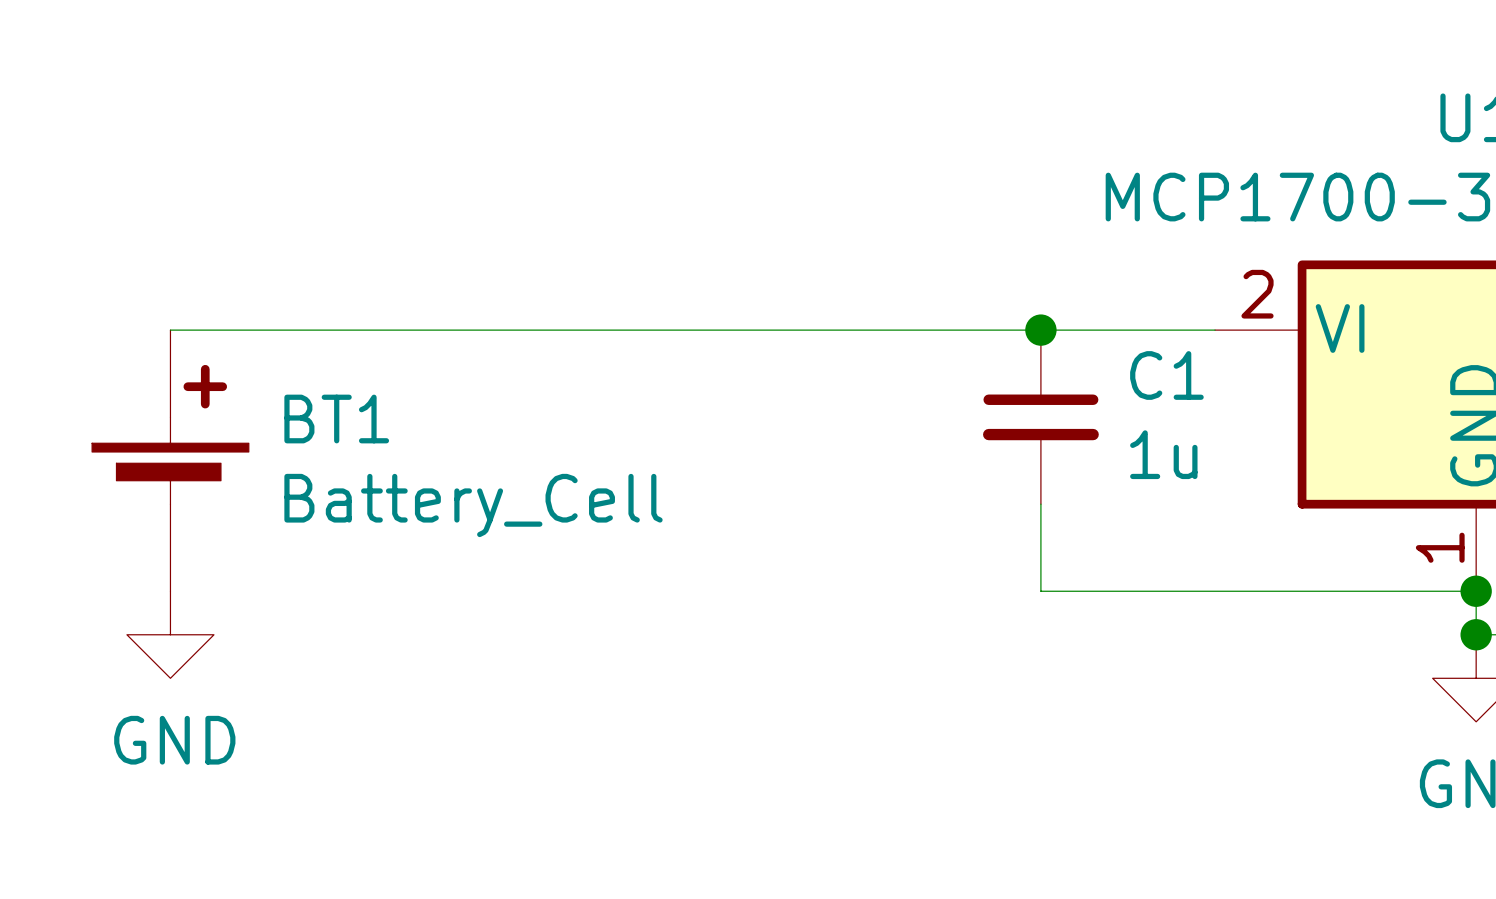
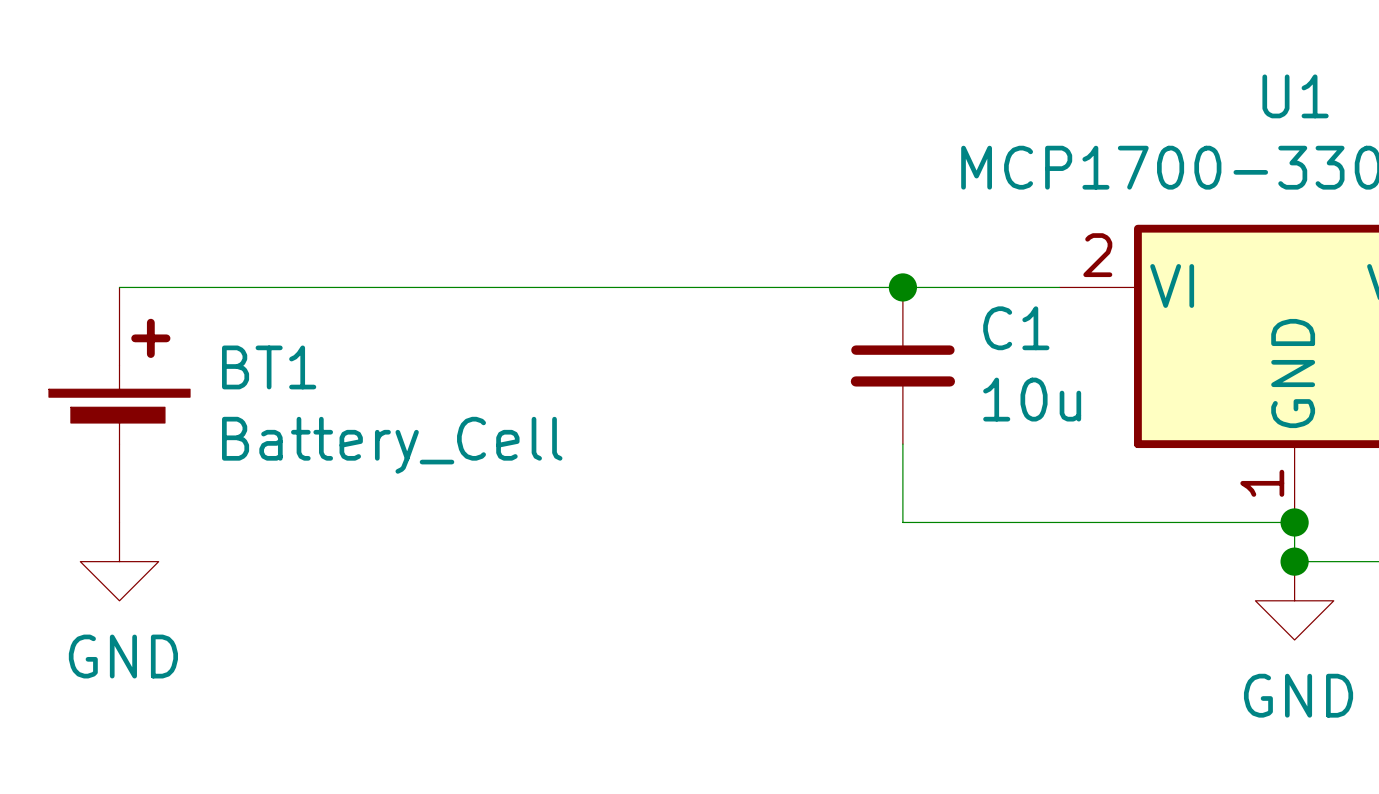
C1 value: 1u (1163, 454) -> 10u (1032, 399)

